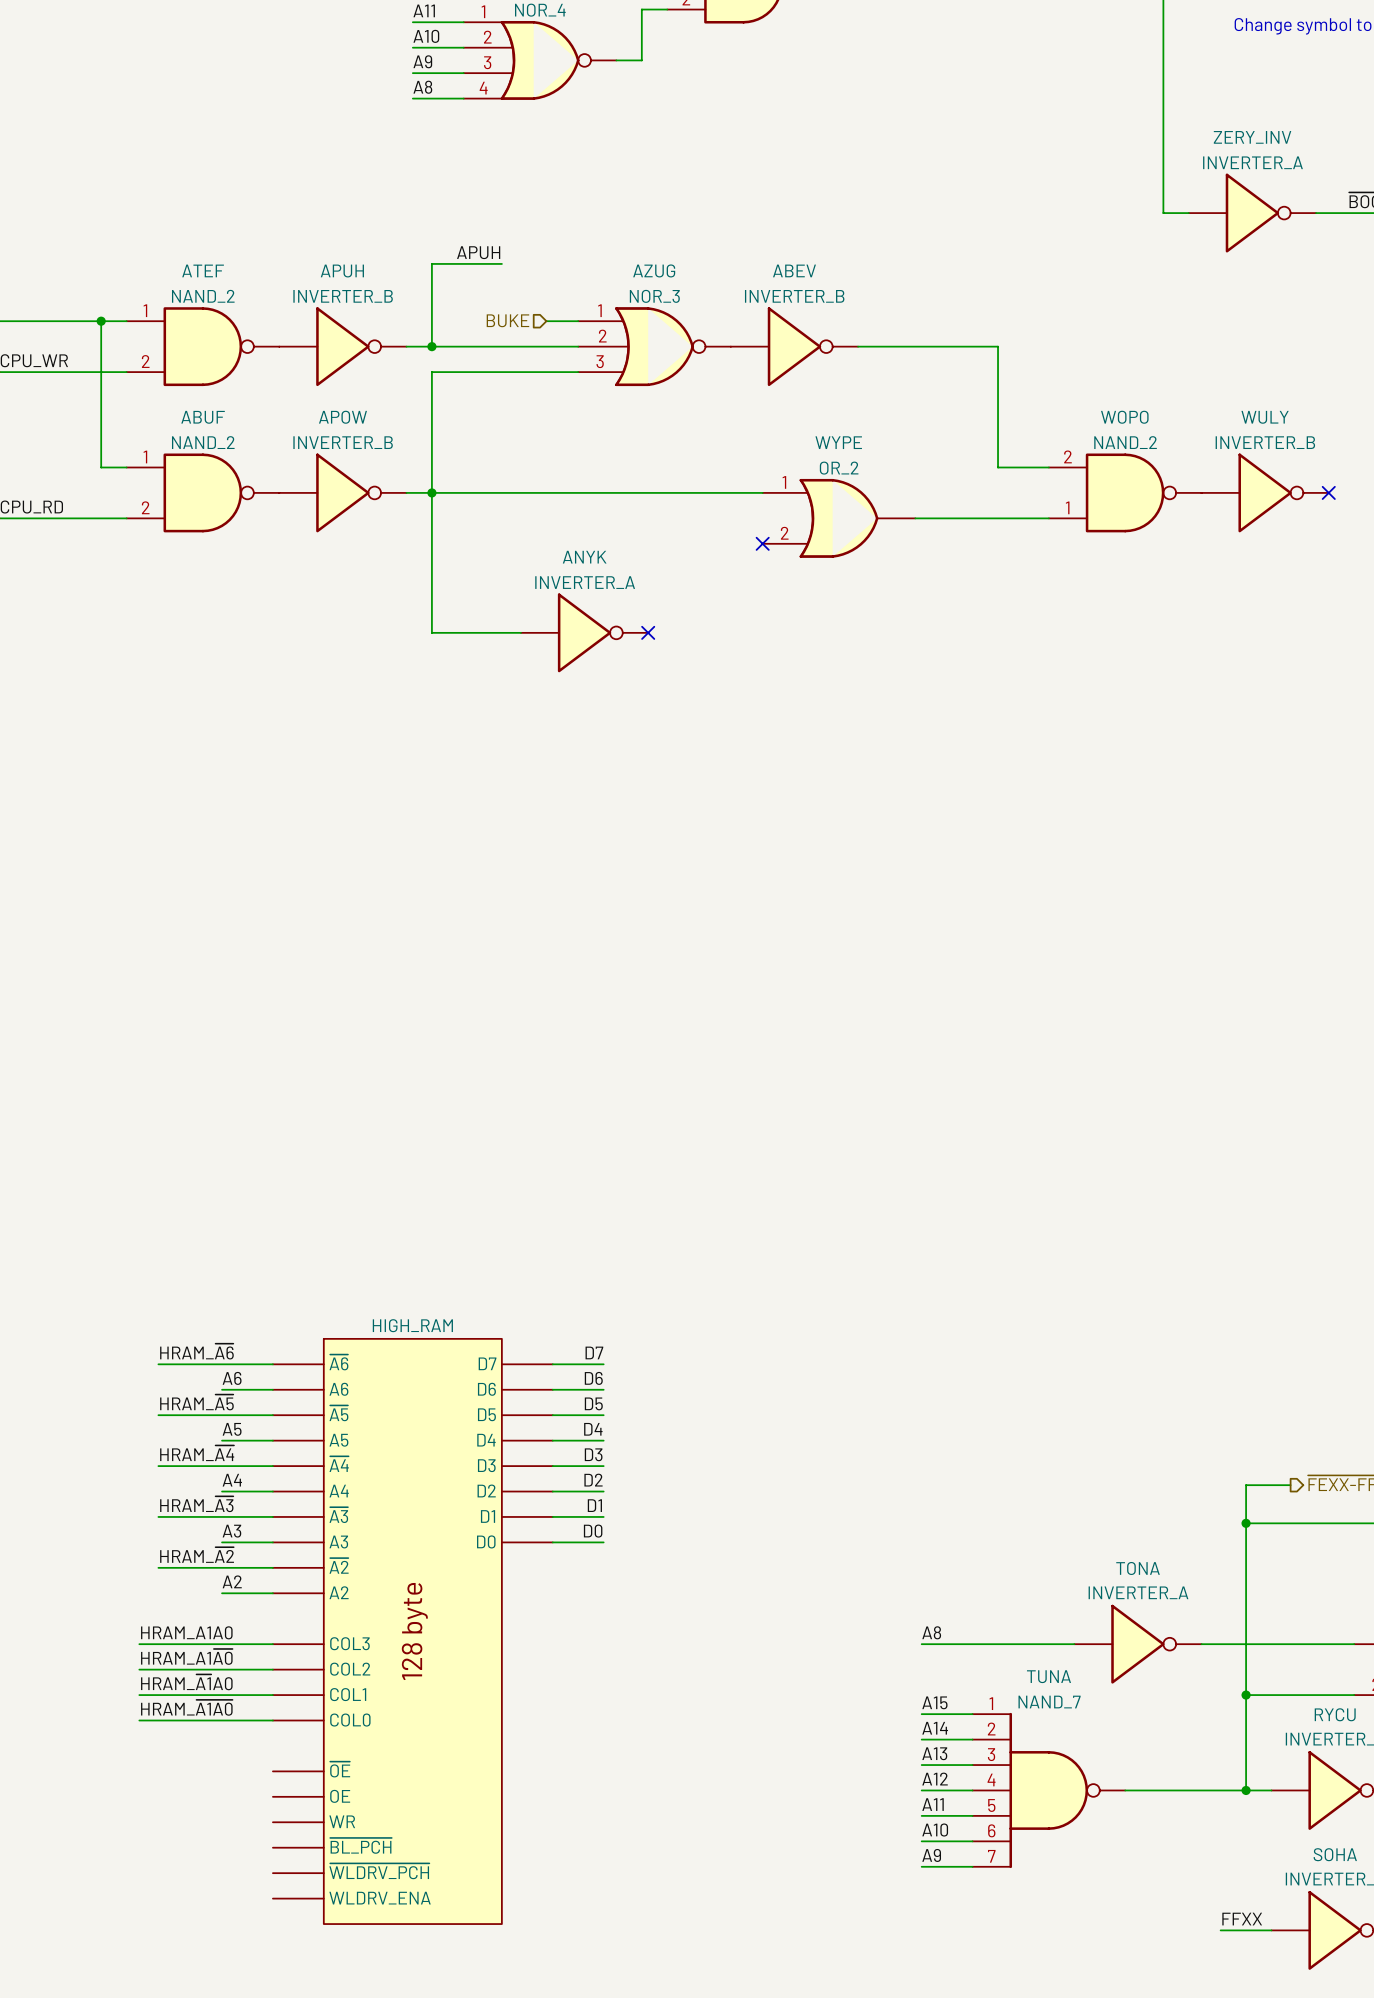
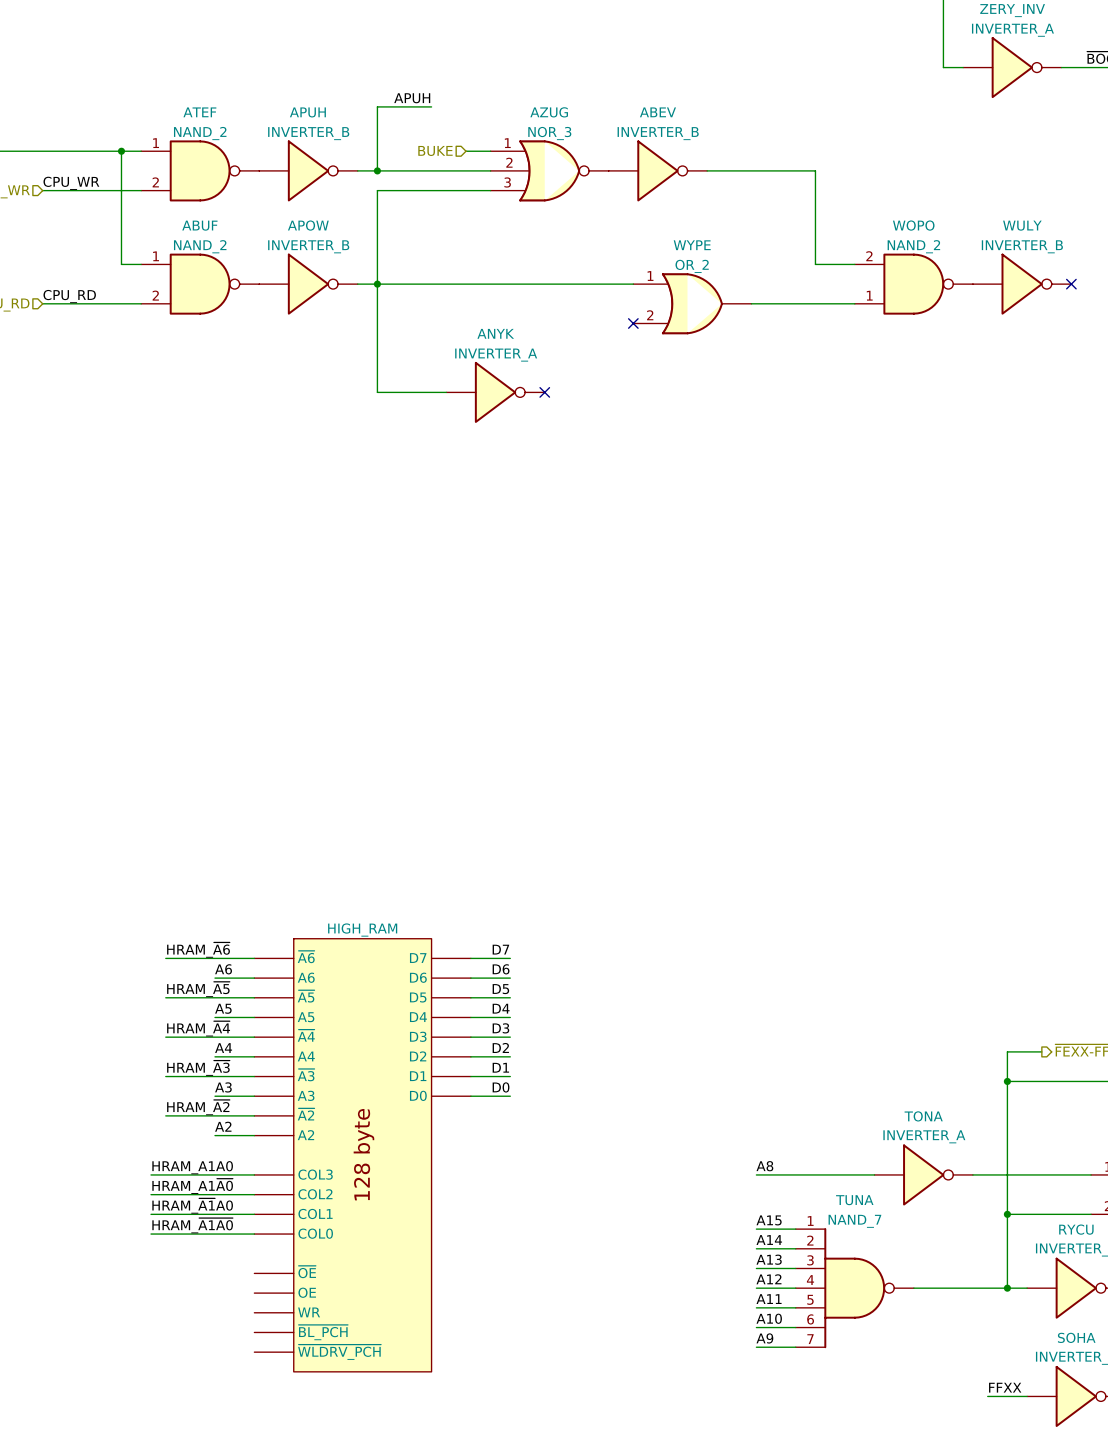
HIGH_RAM: none -> (362, 1155)
HIGH_RAM: (412, 1631) -> none

